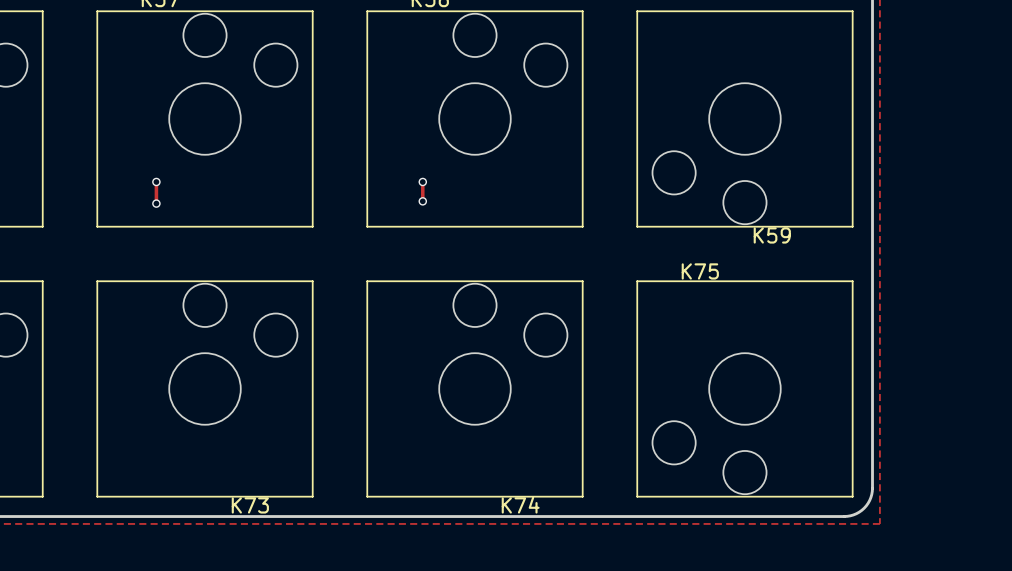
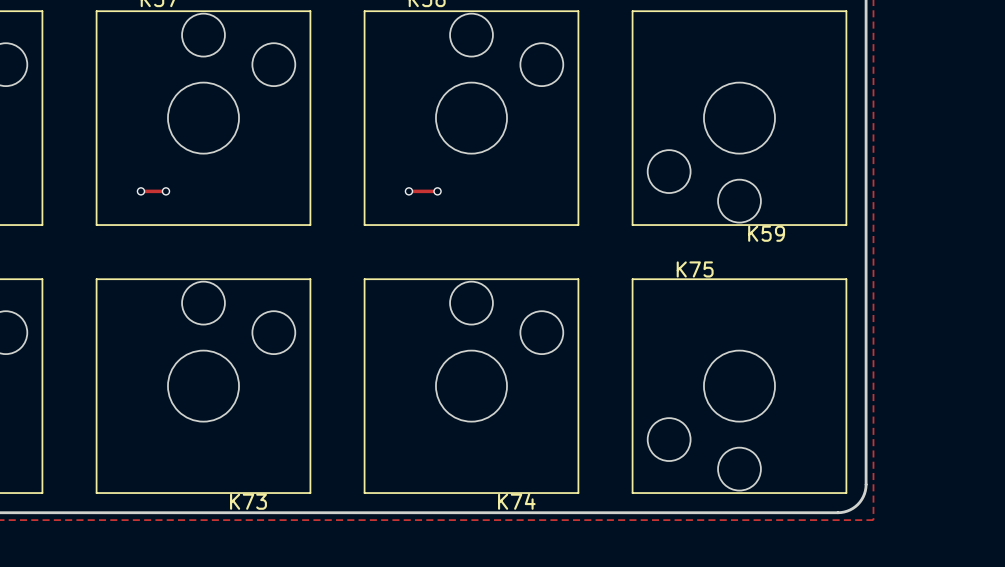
track: (156, 181) (156, 203) -> none
via: (156, 181) -> none
track: (422, 181) (422, 201) -> none
via: (422, 181) -> none
track: none -> (140, 191) (165, 191)
via: none -> (140, 191)
via: none -> (165, 191)
track: none -> (408, 191) (437, 191)
via: none -> (408, 191)
via: none -> (437, 191)
via: (422, 201) -> none
via: (156, 203) -> none

